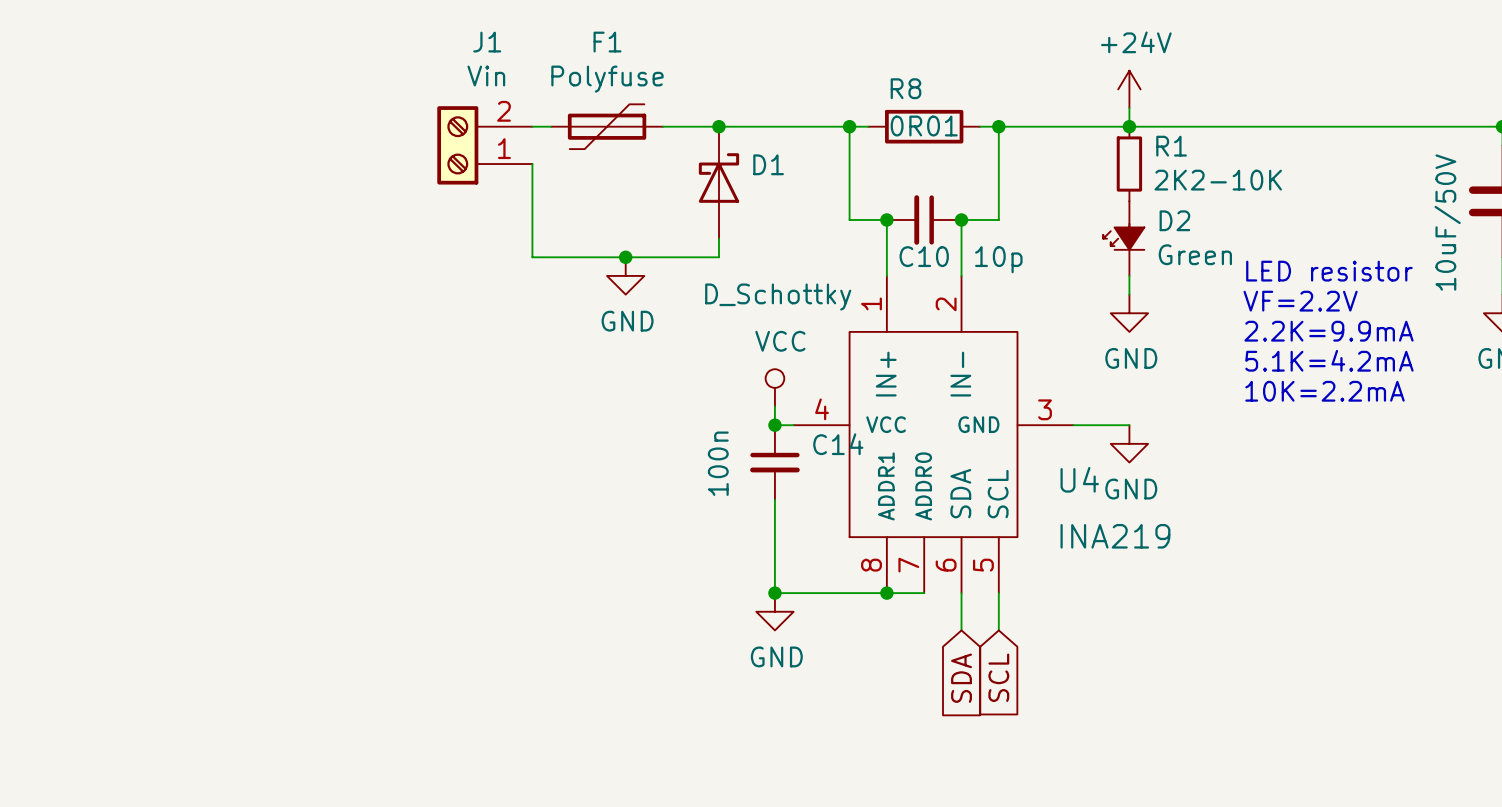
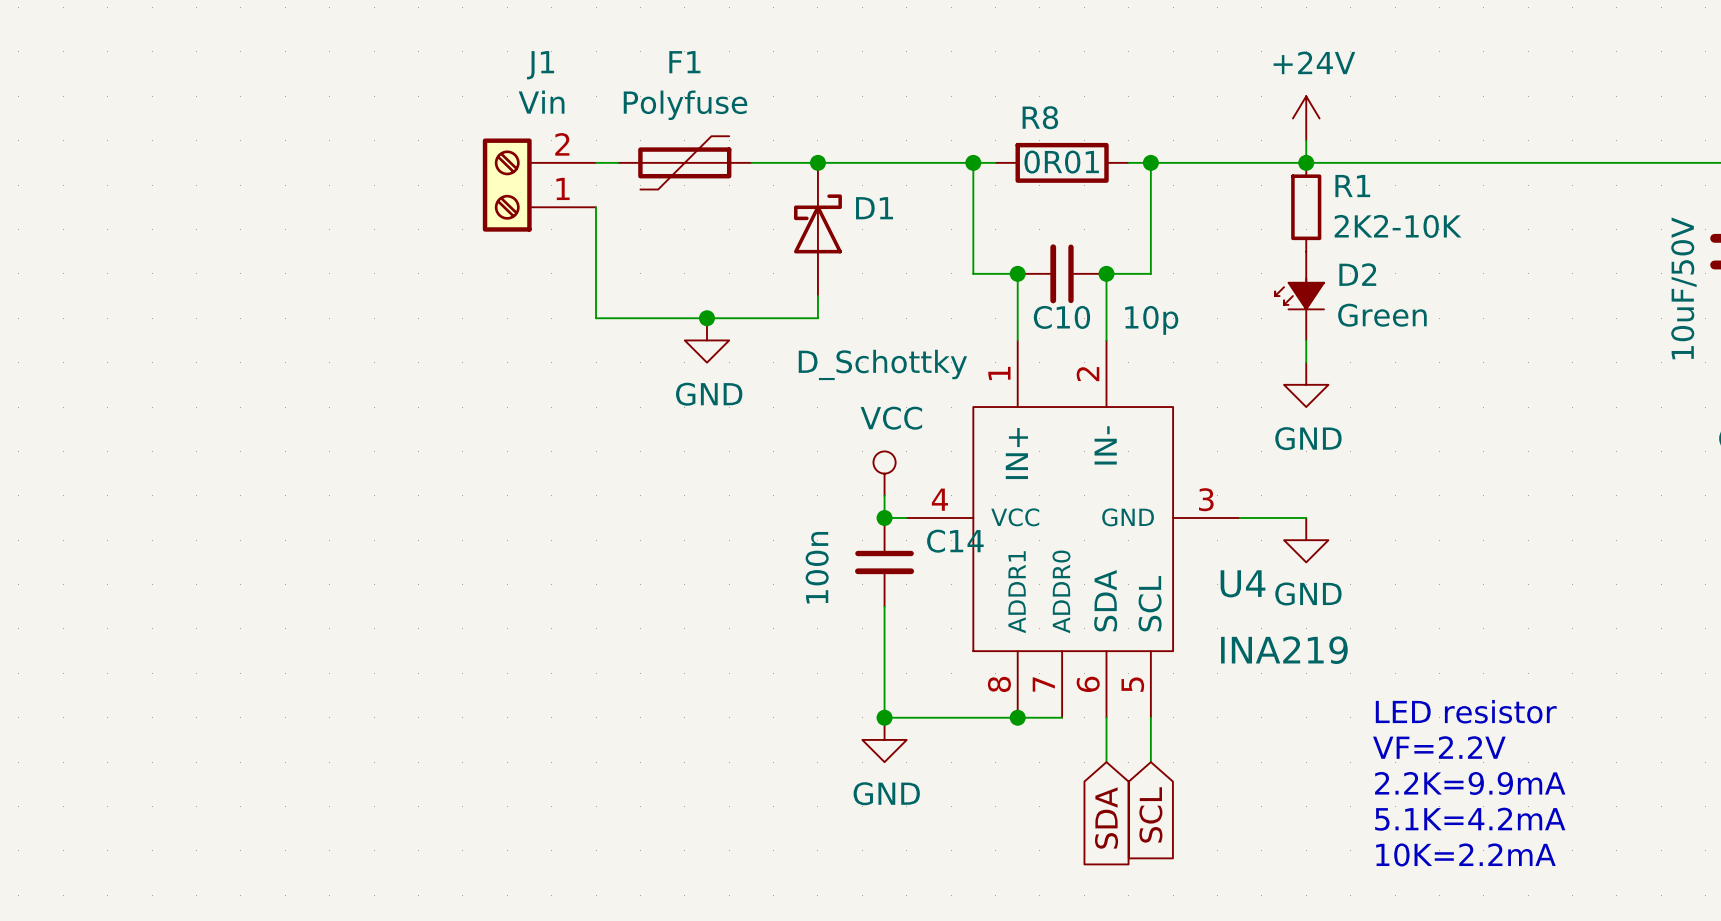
text position: LED resistor (1329, 271) -> LED resistor (1466, 711)
text position: VF=2.2V (1300, 301) -> VF=2.2V (1439, 747)
text position: 2.2K=9.9mA (1329, 331) -> 2.2K=9.9mA (1470, 783)
text position: 5.1K=4.2mA (1329, 360) -> 5.1K=4.2mA (1470, 819)
text position: 10K=2.2mA (1325, 391) -> 10K=2.2mA (1465, 854)

